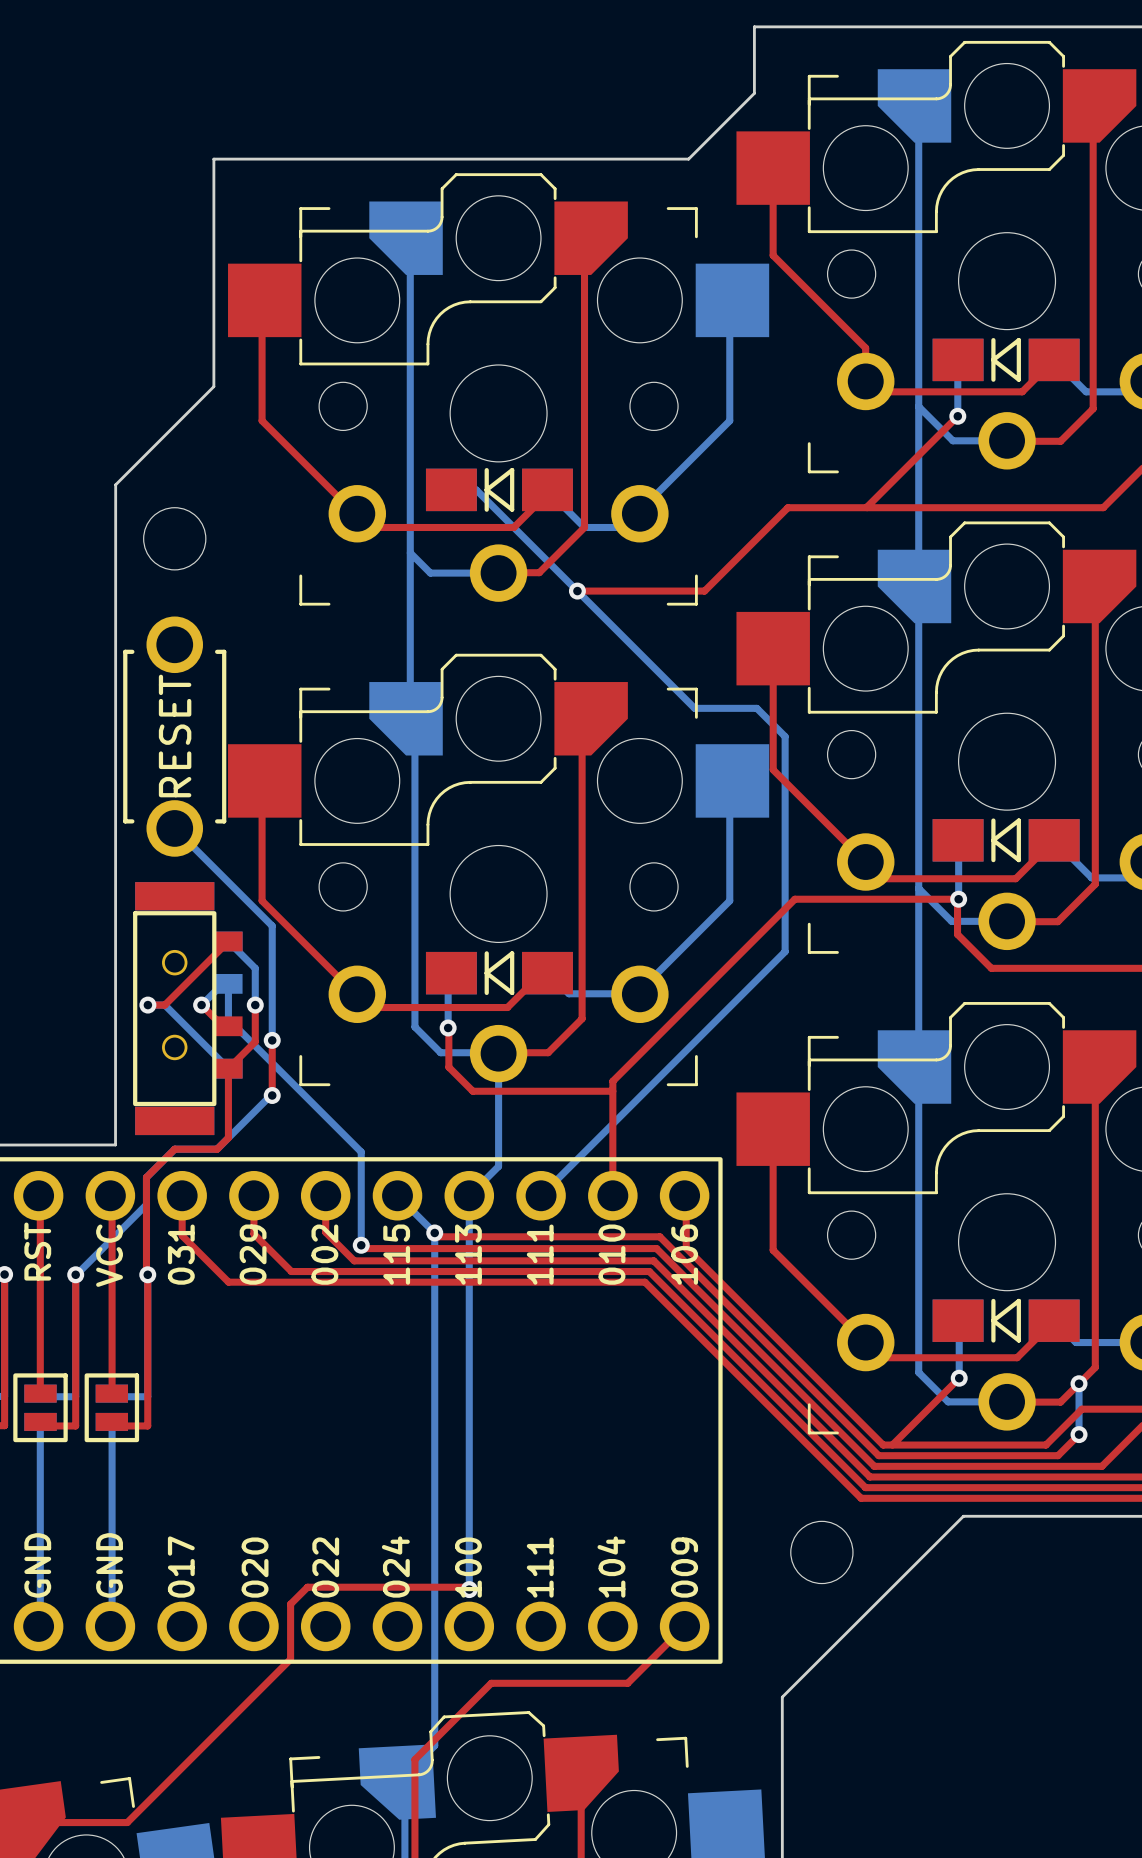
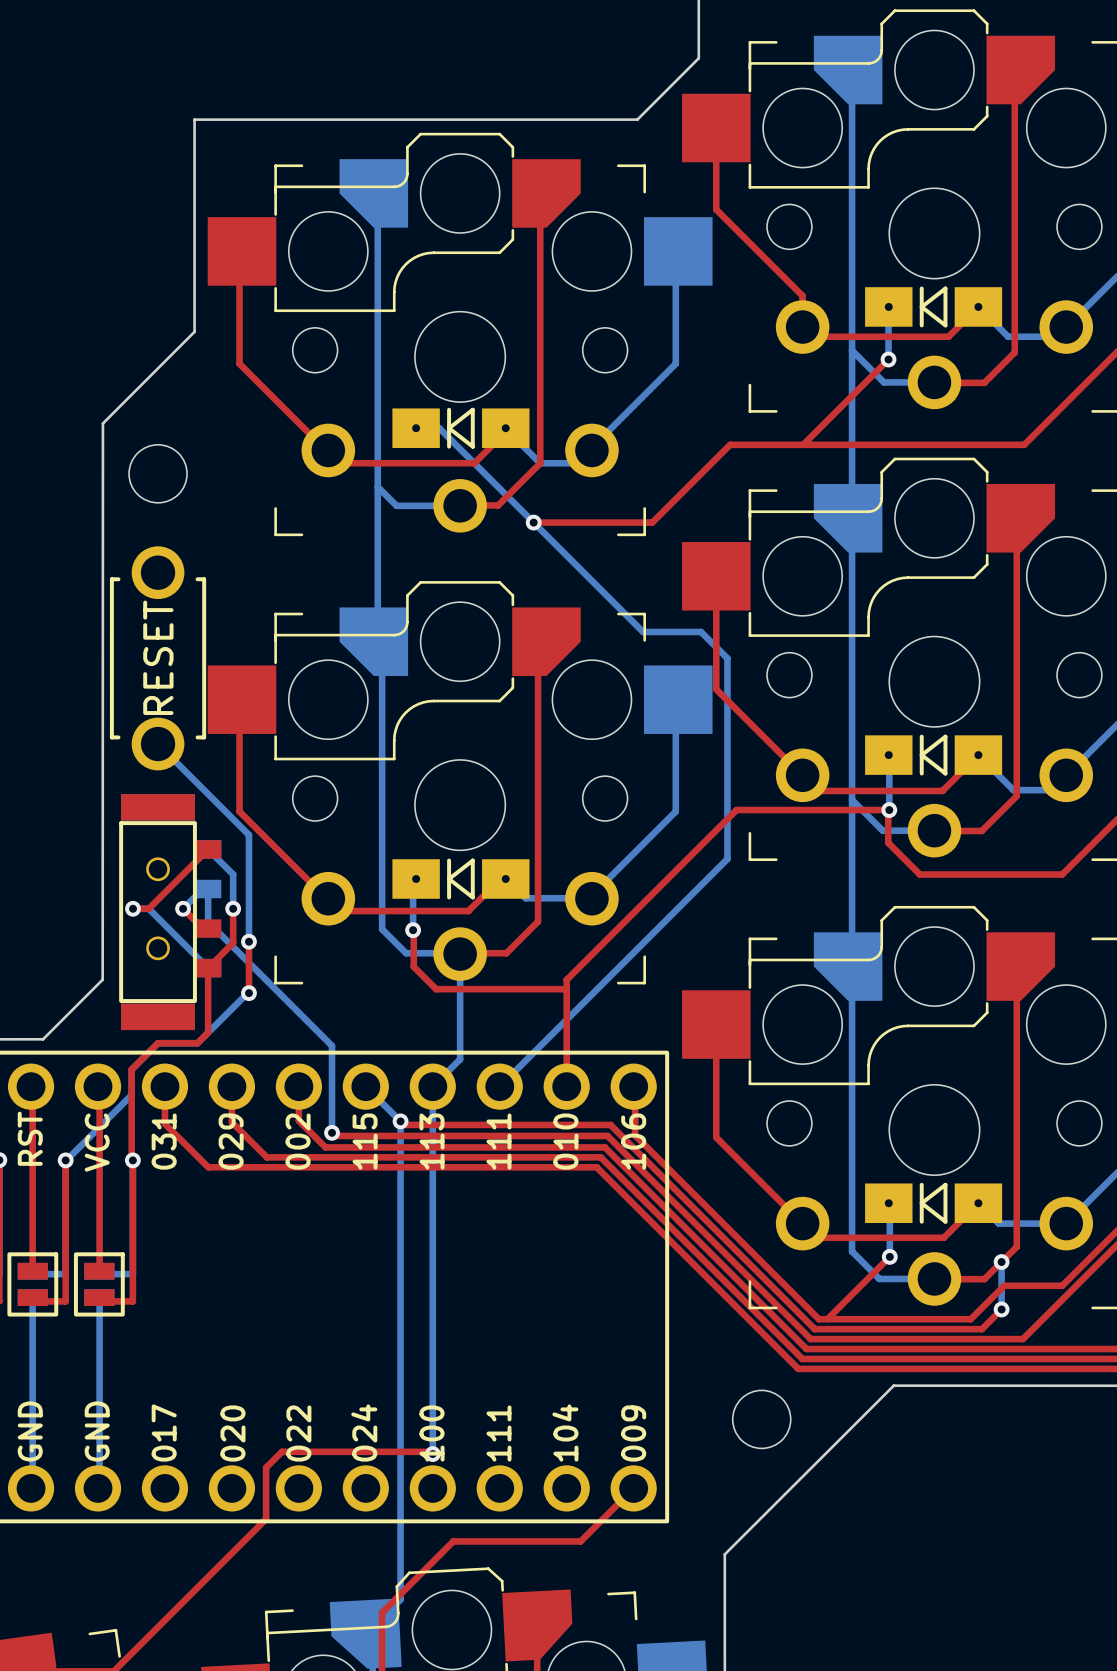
part footprint: [932, 338, 1080, 382] -> [865, 286, 1003, 328]
part footprint: [425, 468, 573, 512] -> [392, 407, 530, 449]
board edge: (115, 484) (115, 1144) (51, 1144) -> (102, 423) (102, 979) (43, 1039)
part footprint: [932, 818, 1080, 863] -> [865, 734, 1003, 776]
part footprint: [425, 951, 573, 996] -> [392, 858, 530, 900]
part footprint: [932, 1298, 1080, 1343] -> [865, 1182, 1003, 1224]

